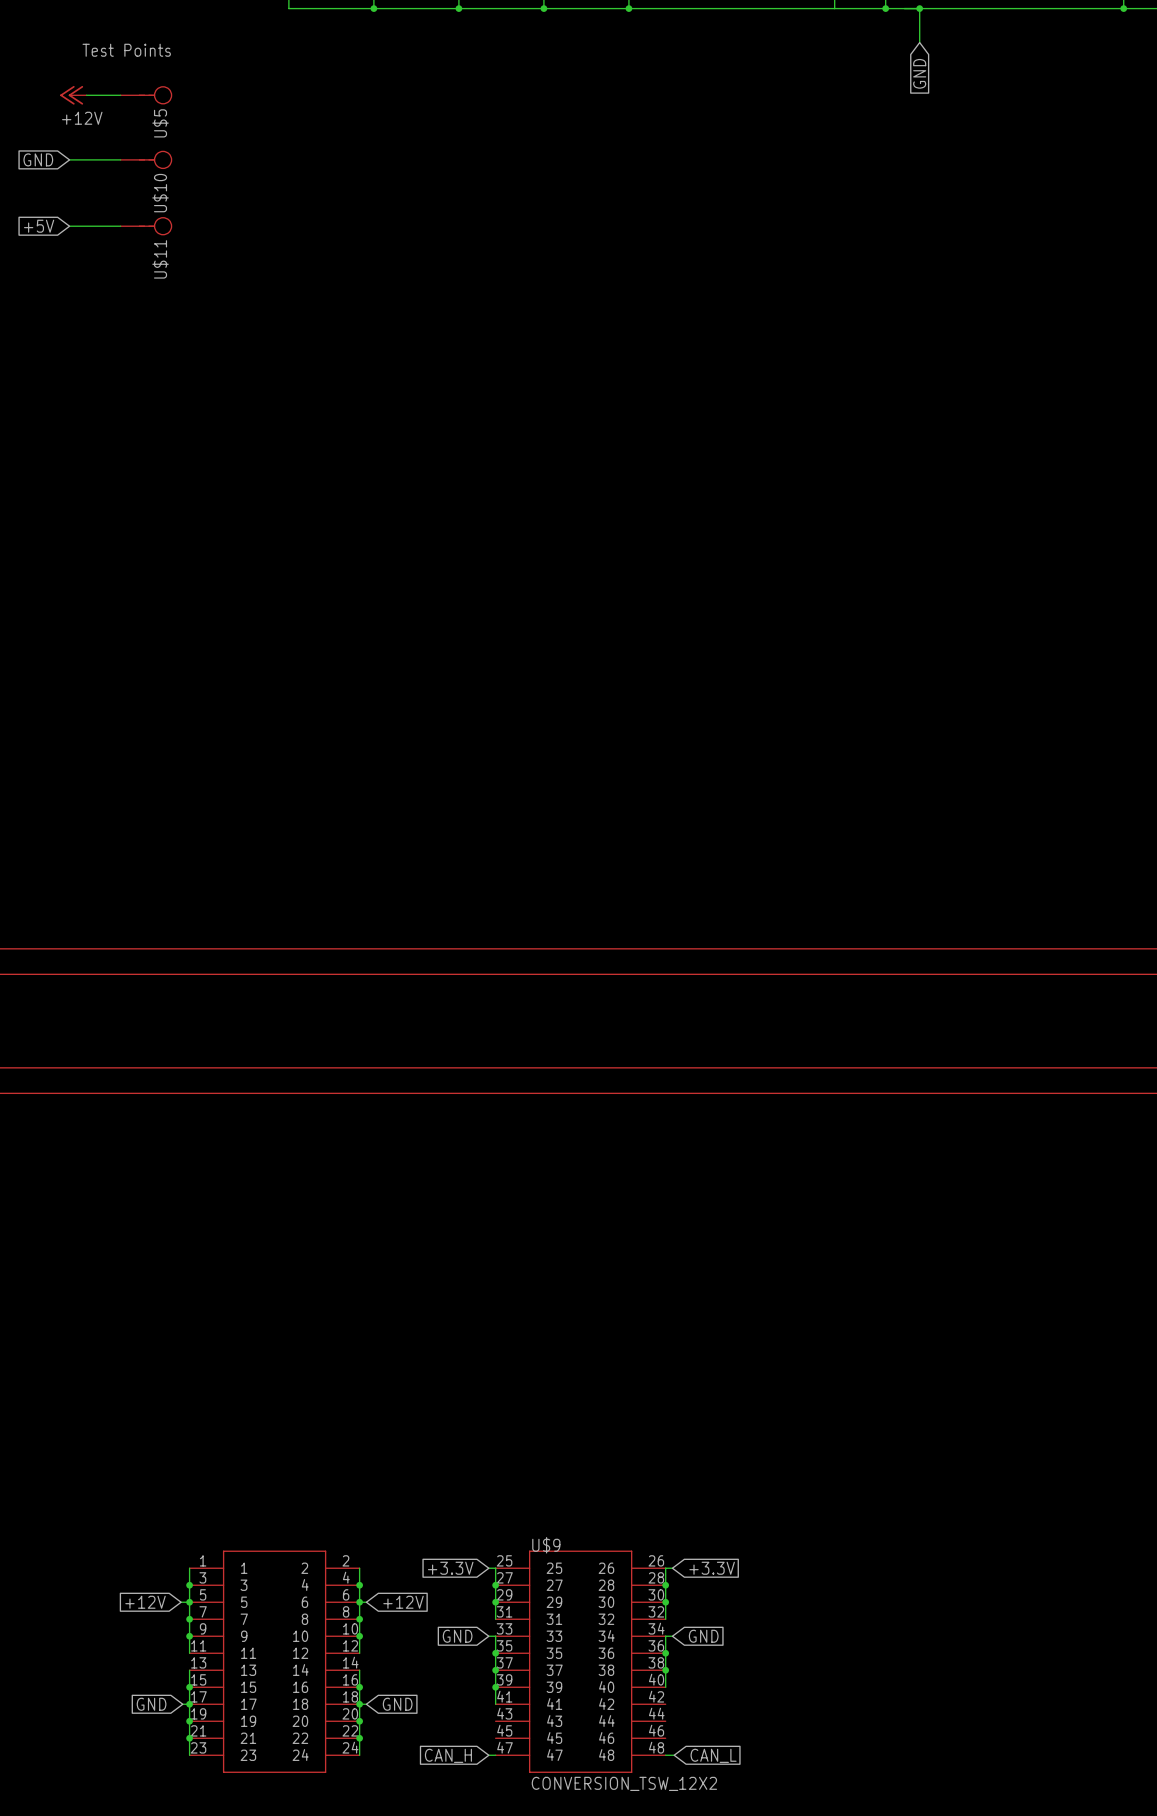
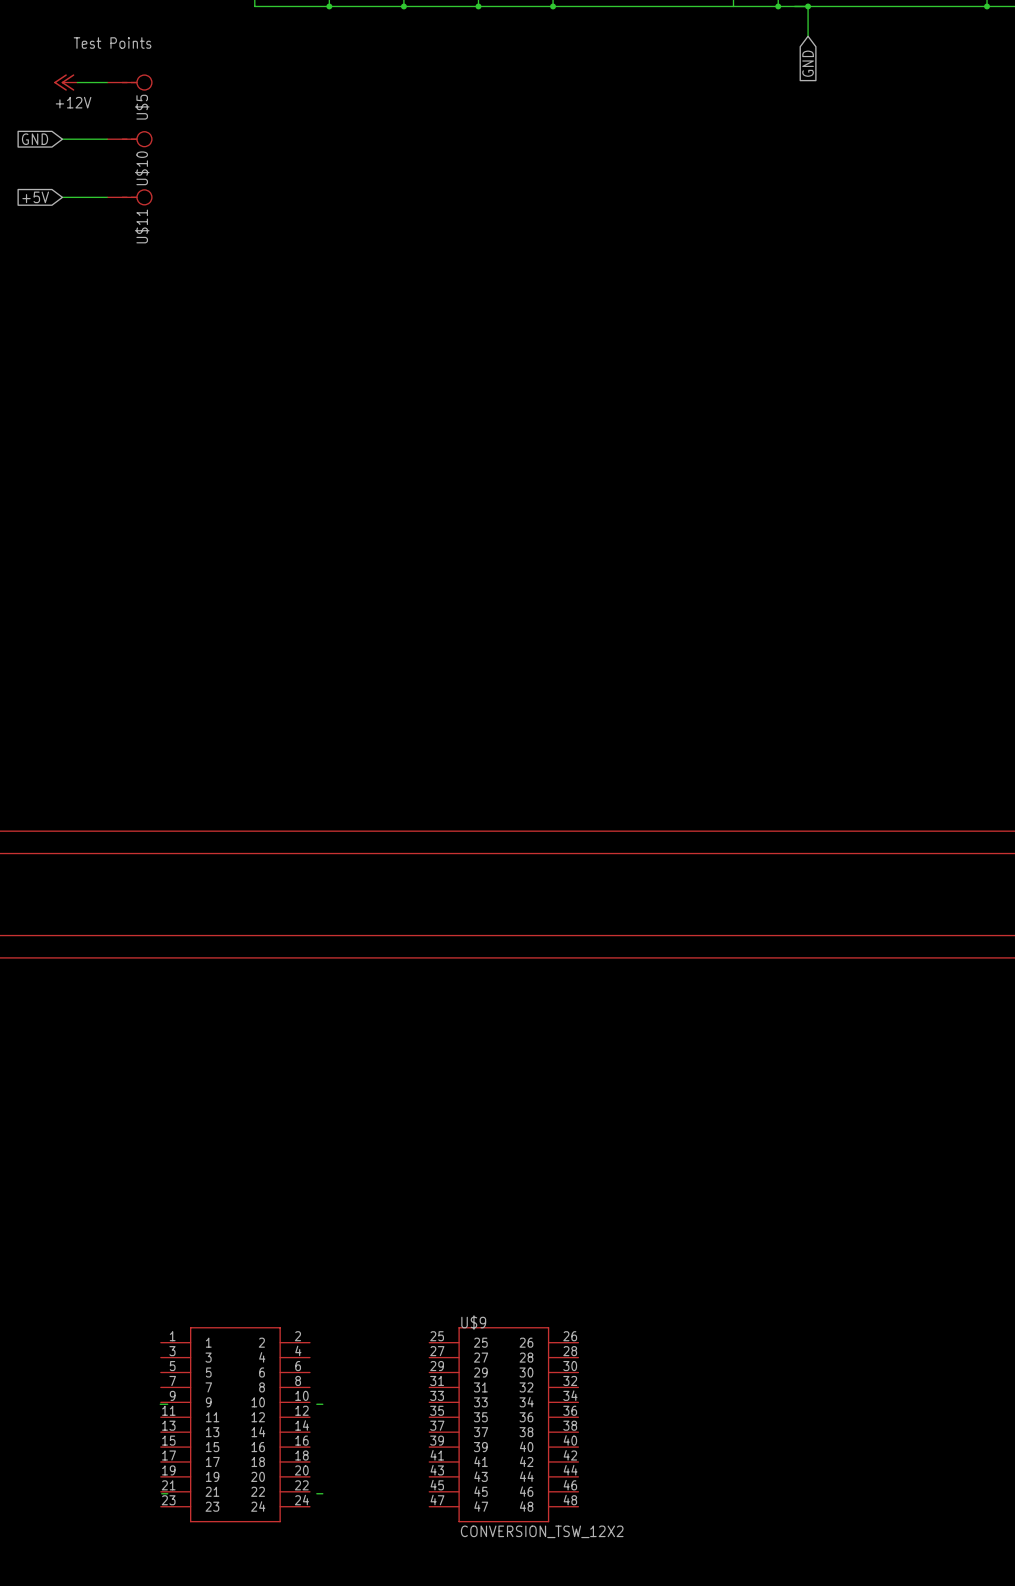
wire: (189, 1568) (189, 1653) -> none
wire: (359, 1568) (359, 1653) -> none
global label: +3.3V (450, 1568) -> none
wire: (488, 1568) (495, 1568) (495, 1619) -> none
wire: (672, 1568) (665, 1568) (665, 1619) -> none
global label: +3.3V (712, 1568) -> none
junction: (189, 1585) -> none
junction: (359, 1585) -> none
junction: (495, 1585) -> none
junction: (665, 1585) -> none
global label: +12V (145, 1602) -> none
junction: (189, 1602) -> none
junction: (359, 1602) -> none
global label: +12V (403, 1602) -> none
junction: (495, 1602) -> none
junction: (665, 1602) -> none
junction: (189, 1619) -> none
junction: (359, 1619) -> none
junction: (189, 1636) -> none
junction: (359, 1636) -> none
global label: GND (457, 1636) -> none
wire: (488, 1636) (495, 1636) (495, 1704) -> none
wire: (672, 1636) (665, 1636) (665, 1687) -> none
global label: GND (703, 1636) -> none
junction: (495, 1653) -> none
junction: (665, 1653) -> none
U$9 position: (427, 1661) -> (369, 1424)
wire: (189, 1670) (189, 1755) -> none
wire: (359, 1670) (359, 1755) -> none
junction: (495, 1670) -> none
junction: (665, 1670) -> none
junction: (189, 1687) -> none
junction: (359, 1687) -> none
junction: (495, 1687) -> none
global label: GND (151, 1704) -> none
junction: (189, 1704) -> none
junction: (359, 1704) -> none
global label: GND (397, 1704) -> none
junction: (189, 1721) -> none
junction: (359, 1721) -> none
junction: (189, 1738) -> none
junction: (359, 1738) -> none
global label: CAN_H (448, 1755) -> none
wire: (488, 1755) (495, 1755) -> none
wire: (665, 1755) (674, 1755) -> none
global label: CAN_L (713, 1755) -> none

